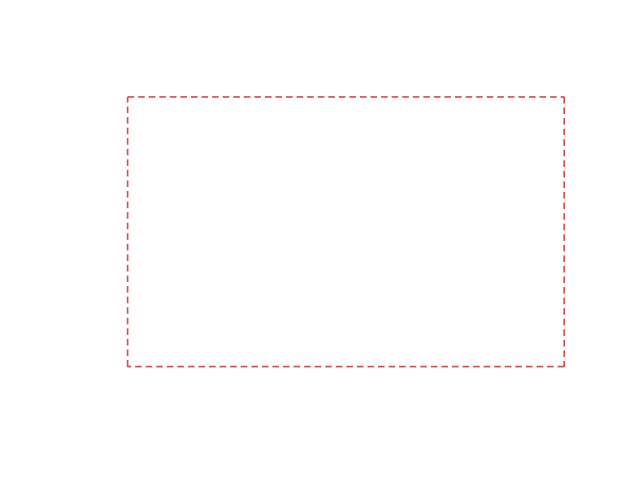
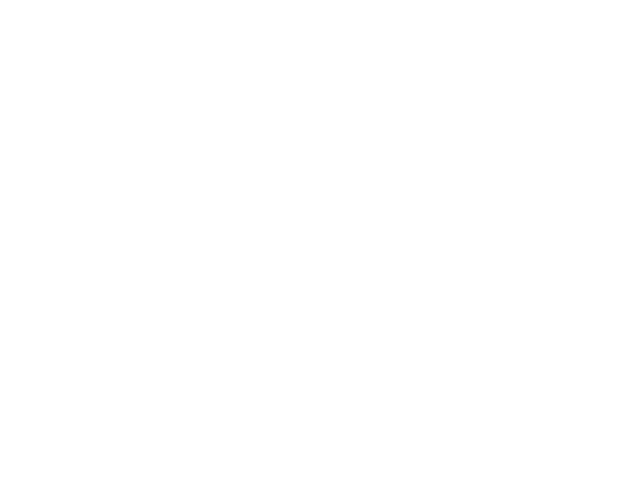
zone outline: (127, 96) (564, 96) (564, 366) (127, 366) (127, 96) -> none

